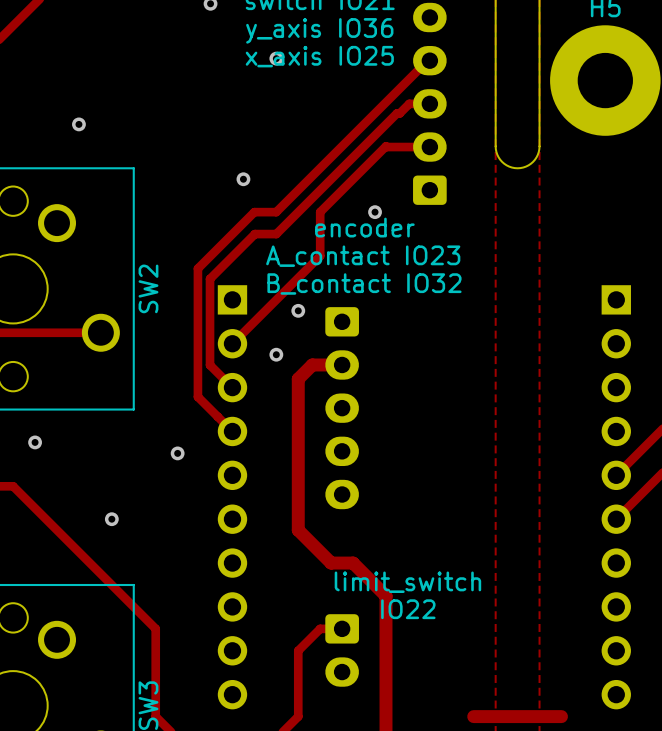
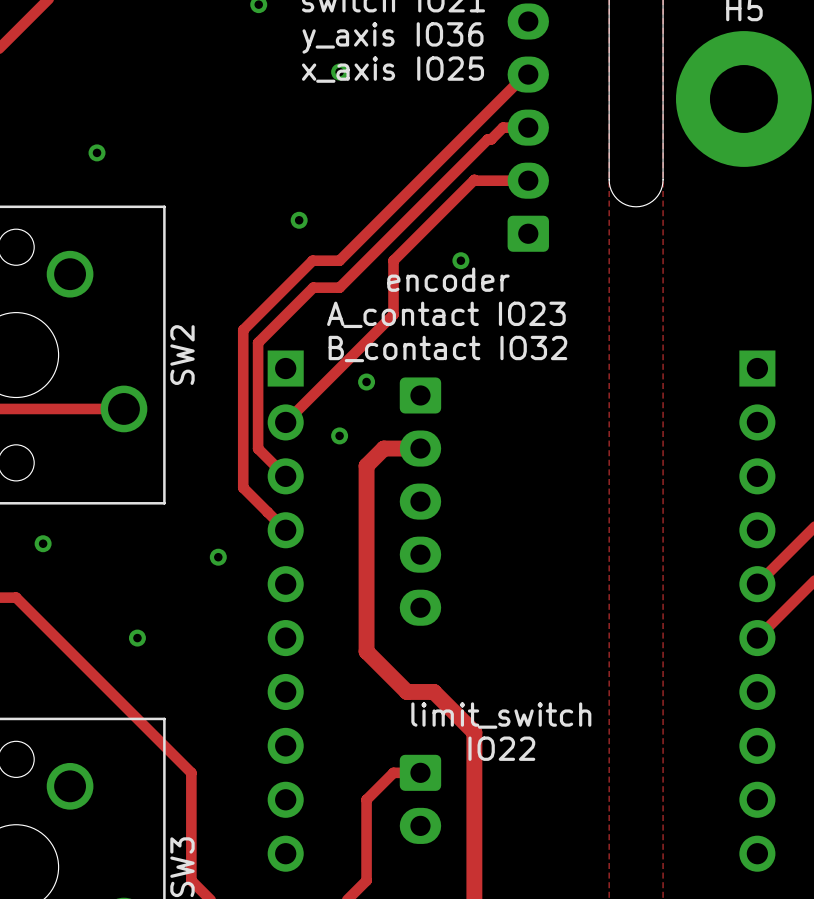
track: (473, 716) (561, 716) -> none

